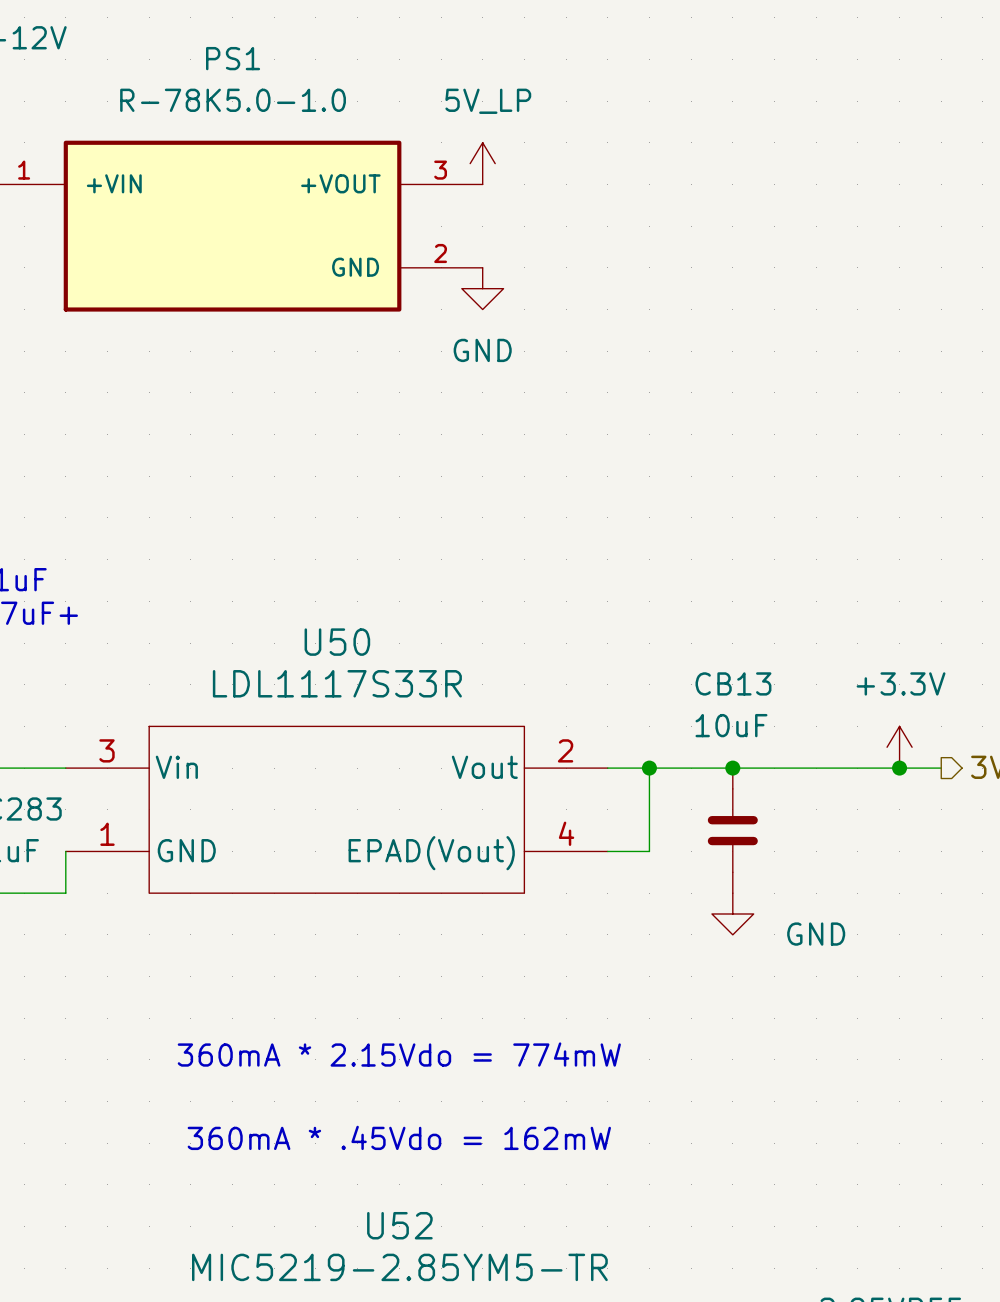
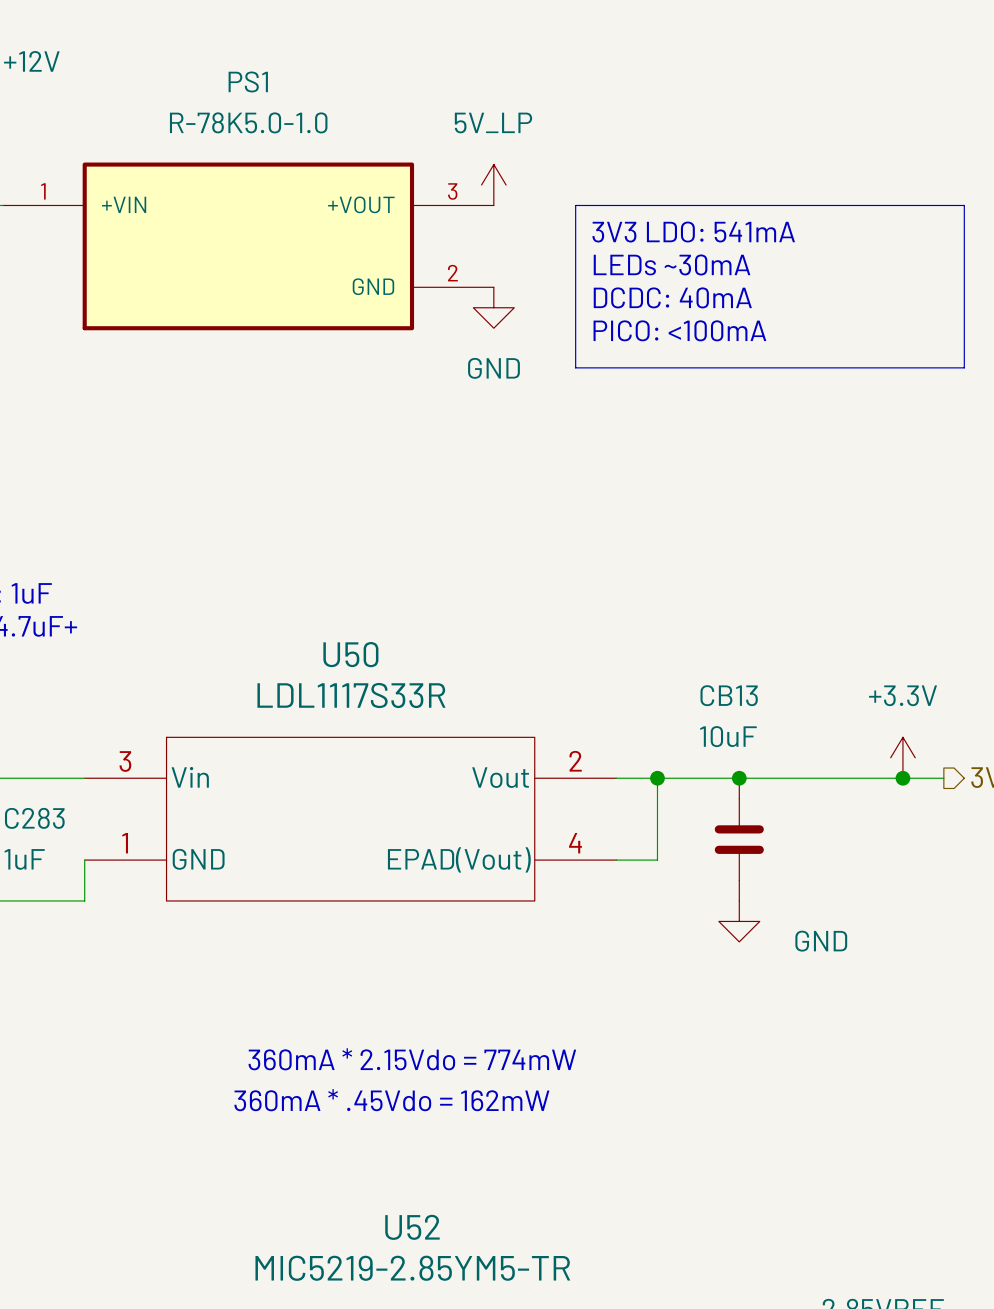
line: none -> (575, 205) (964, 205) (964, 367) (575, 367) (575, 205)
text: none -> 3V3 LDO: 541mA (693, 232)
text: none -> LEDs ~30mA (672, 264)
text: none -> DCDC: 40mA (672, 297)
text: none -> PICO: <100mA (679, 330)
text position: 360mA * .45Vdo = 162mW (399, 1137) -> 360mA * .45Vdo = 162mW (391, 1100)

